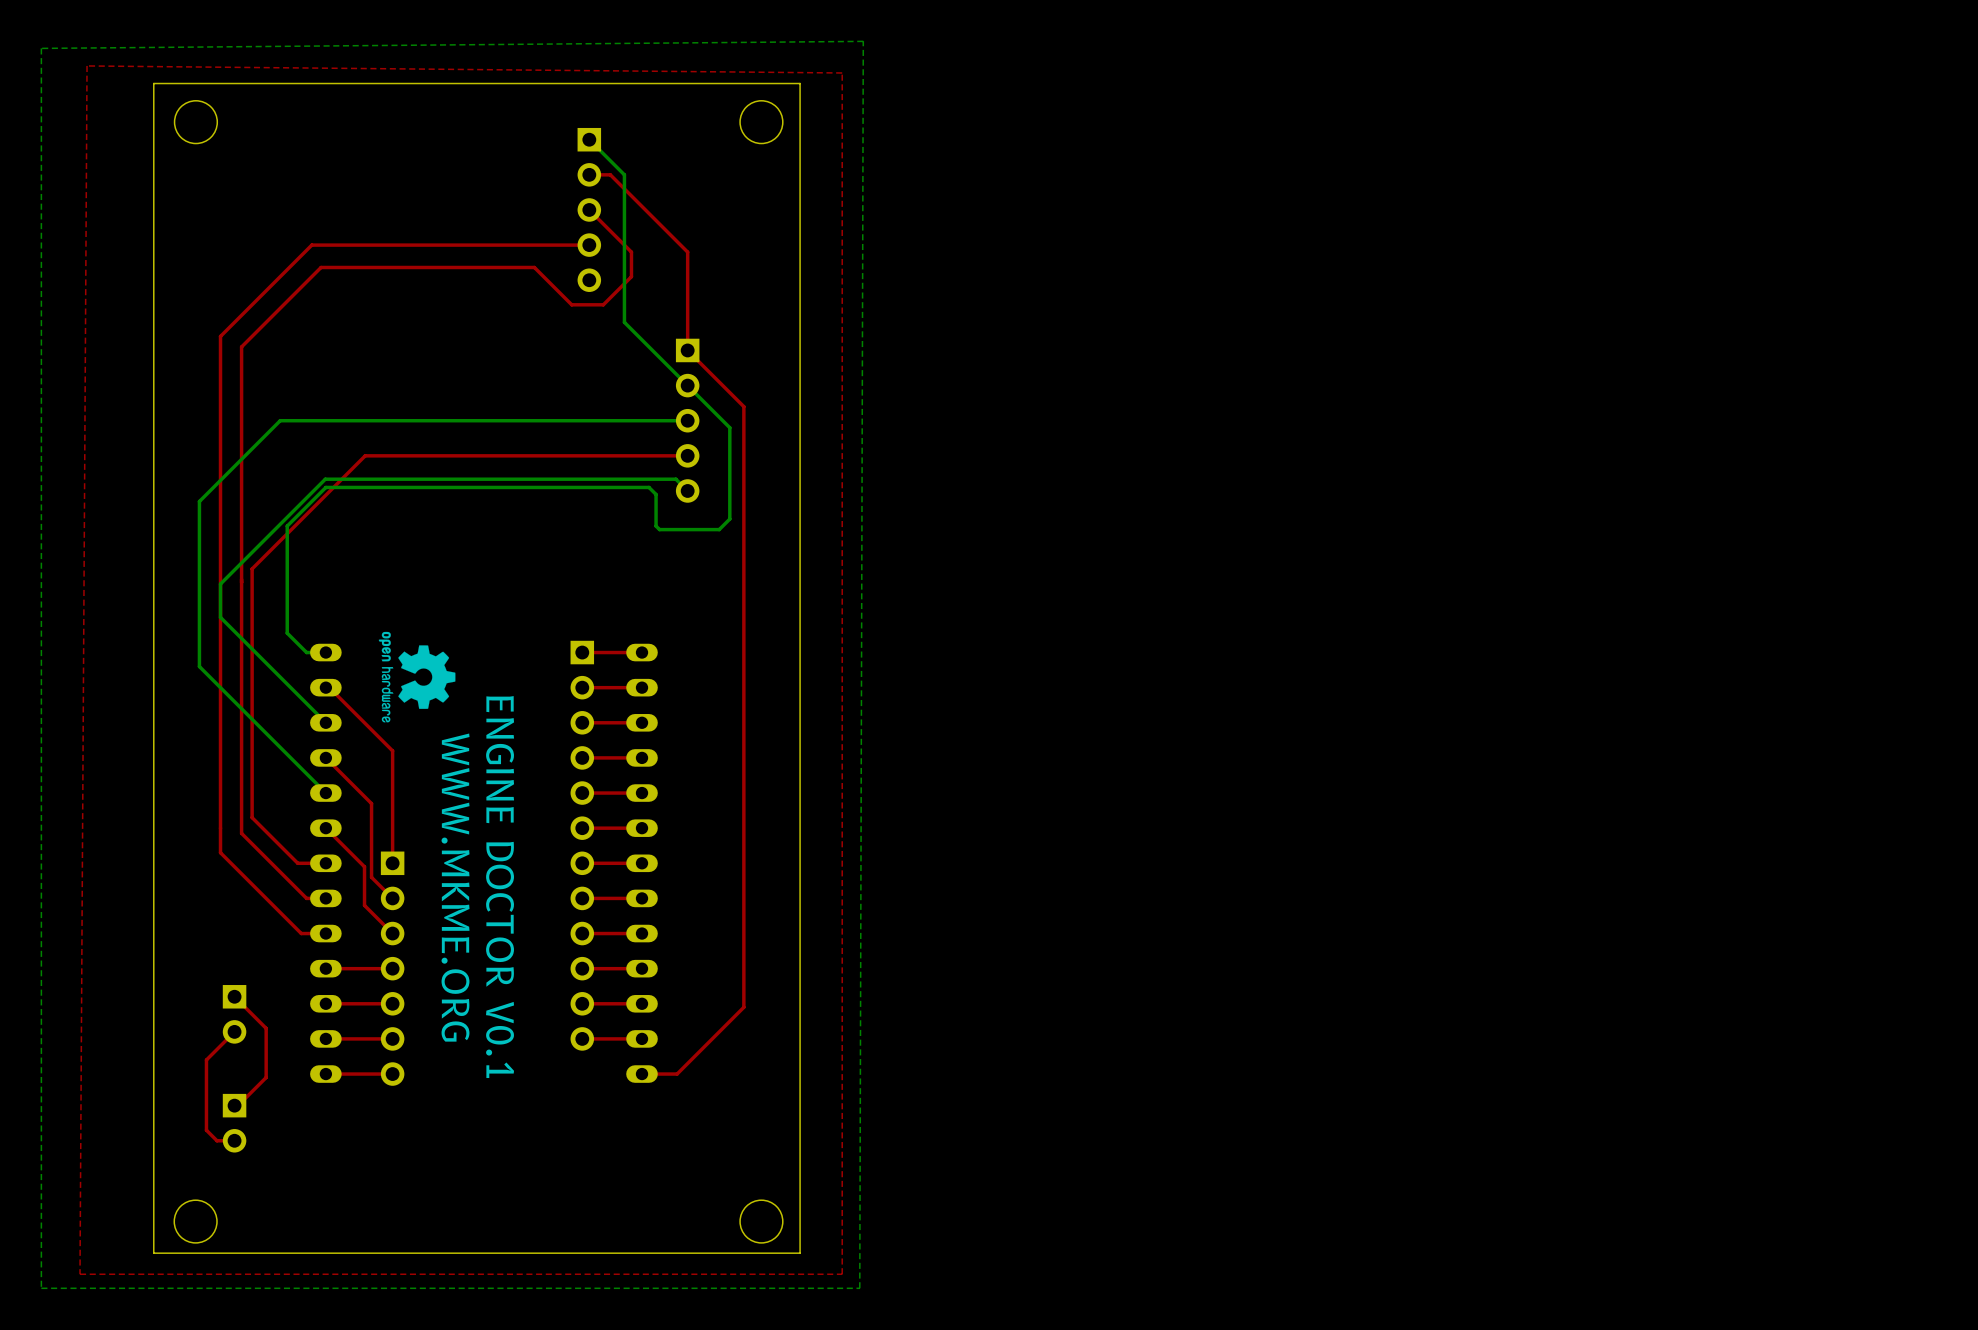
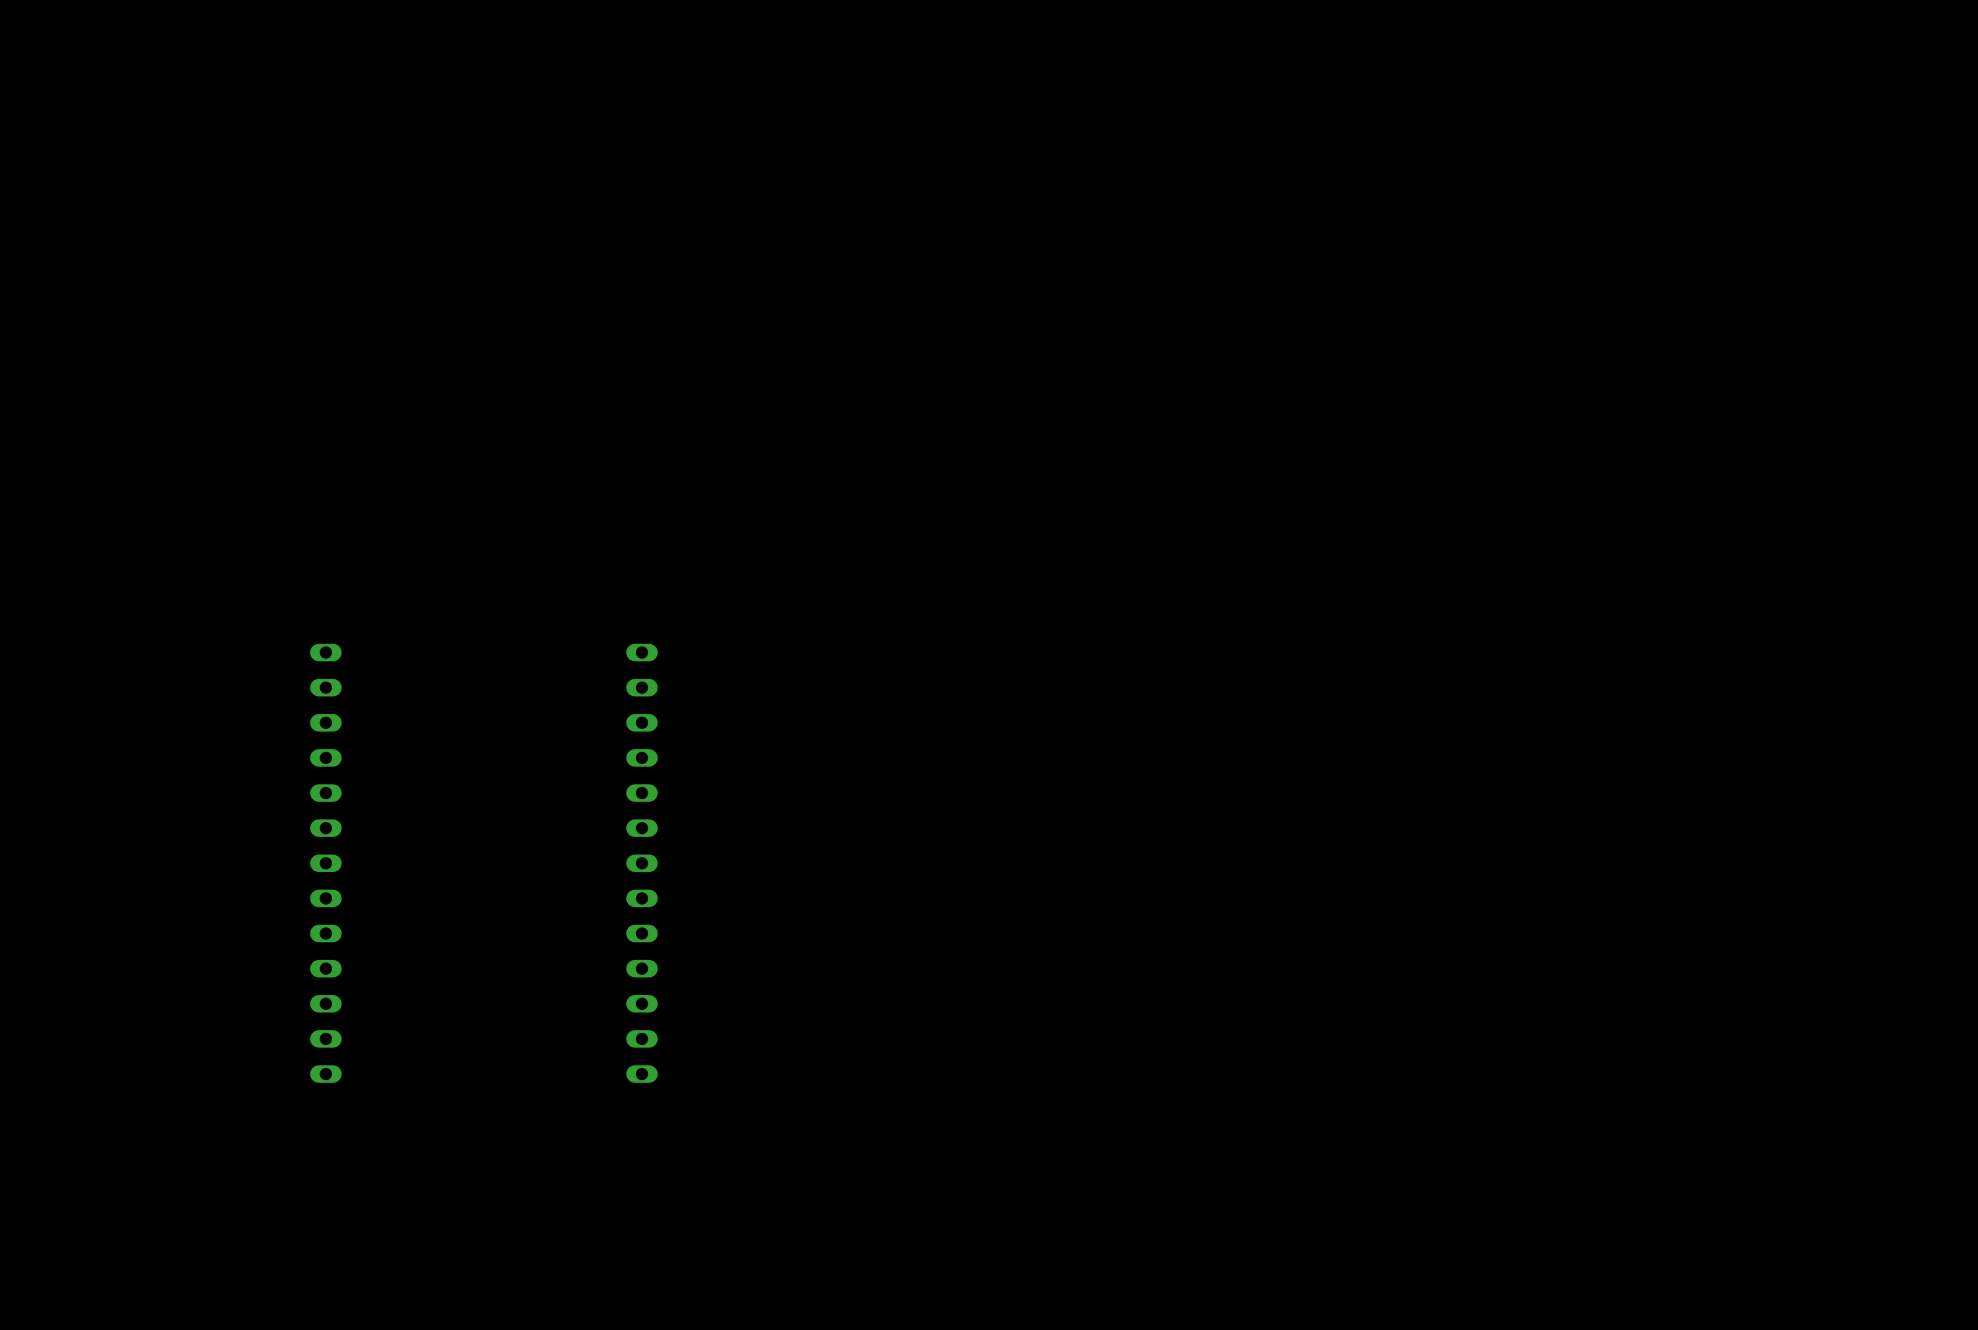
bottom zone outline: (863, 41) (859, 1288) (41, 1288) (41, 48) (863, 41) -> none
top zone outline: (87, 65) (842, 72) (842, 1274) (80, 1274) (87, 65) -> none
board edge: (800, 83) (800, 1253) (153, 1253) (153, 83) (800, 83) -> none
round board edge: [174, 100, 218, 144] -> none
round board edge: [739, 100, 784, 144] -> none
bottom track: (589, 139) (624, 174) (624, 322) (729, 427) (729, 519) (719, 529) (659, 529) (656, 526) (656, 494) (649, 487) (325, 487) (287, 526) (287, 633) (306, 652) (325, 652) -> none
top track: (589, 174) (610, 174) (687, 252) (687, 350) (743, 406) (743, 1007) (677, 1074) (642, 1074) -> none
top track: (589, 209) (631, 252) (631, 276) (603, 304) (571, 304) (534, 267) (321, 267) (241, 346) (241, 833) (306, 898) (325, 898) -> none
part: (589, 209) -> none
top track: (589, 245) (311, 245) (220, 336) (220, 852) (301, 933) (325, 933) -> none
bottom track: (687, 420) (280, 420) (199, 501) (199, 666) (325, 793) -> none
part: (687, 420) -> none
top track: (687, 455) (365, 455) (252, 568) (252, 817) (297, 863) (325, 863) -> none
bottom track: (687, 490) (675, 479) (325, 479) (220, 584) (220, 617) (325, 722) -> none
drawing: [378, 631, 456, 723] -> none
top track: (642, 652) (582, 652) -> none
top track: (325, 687) (329, 687) (392, 750) (392, 863) -> none
top track: (642, 687) (582, 687) -> none
top track: (642, 722) (582, 722) -> none
top track: (325, 757) (371, 803) (371, 877) (392, 898) -> none
top track: (642, 757) (582, 757) -> none
top track: (642, 793) (582, 793) -> none
top track: (325, 828) (364, 866) (364, 905) (392, 933) -> none
top track: (642, 828) (582, 828) -> none
part: (582, 845) -> none
top track: (642, 863) (582, 863) -> none
text: WWW.MKME.ORG (455, 887) -> none
text: ENGINE DOCTOR V0.1 (500, 887) -> none
top track: (642, 898) (582, 898) -> none
top track: (642, 933) (582, 933) -> none
top track: (392, 968) (325, 968) -> none
part: (392, 968) -> none
top track: (642, 968) (582, 968) -> none
top track: (234, 996) (266, 1028) (266, 1077) (238, 1105) (234, 1105) -> none
top track: (392, 1003) (325, 1003) -> none
top track: (642, 1003) (582, 1003) -> none
part: (234, 1014) -> none
top track: (234, 1031) (206, 1059) (206, 1130) (216, 1140) (234, 1140) -> none
top track: (392, 1038) (325, 1038) -> none
top track: (642, 1038) (582, 1038) -> none
top track: (392, 1074) (325, 1074) -> none
part: (234, 1123) -> none
round board edge: [173, 1199, 218, 1244] -> none
round board edge: [739, 1199, 784, 1244] -> none

